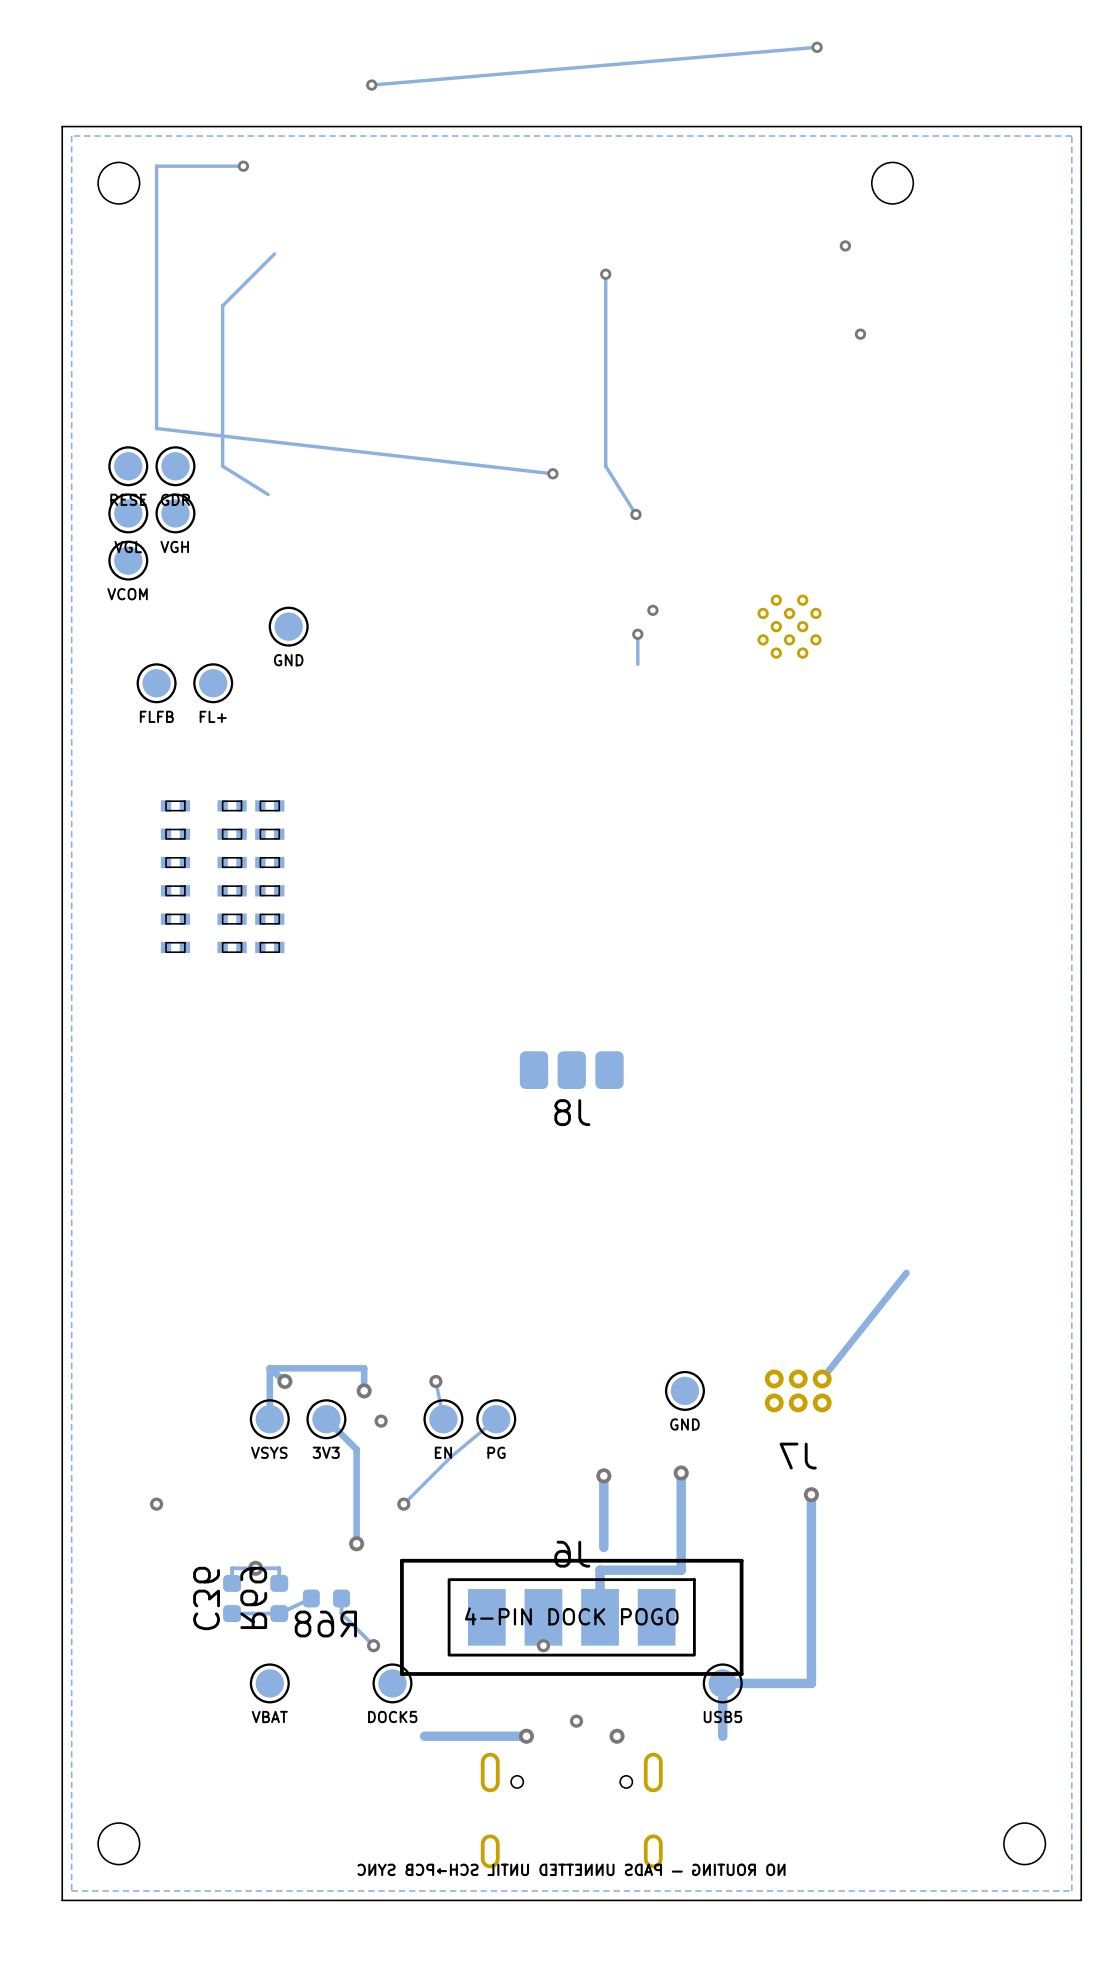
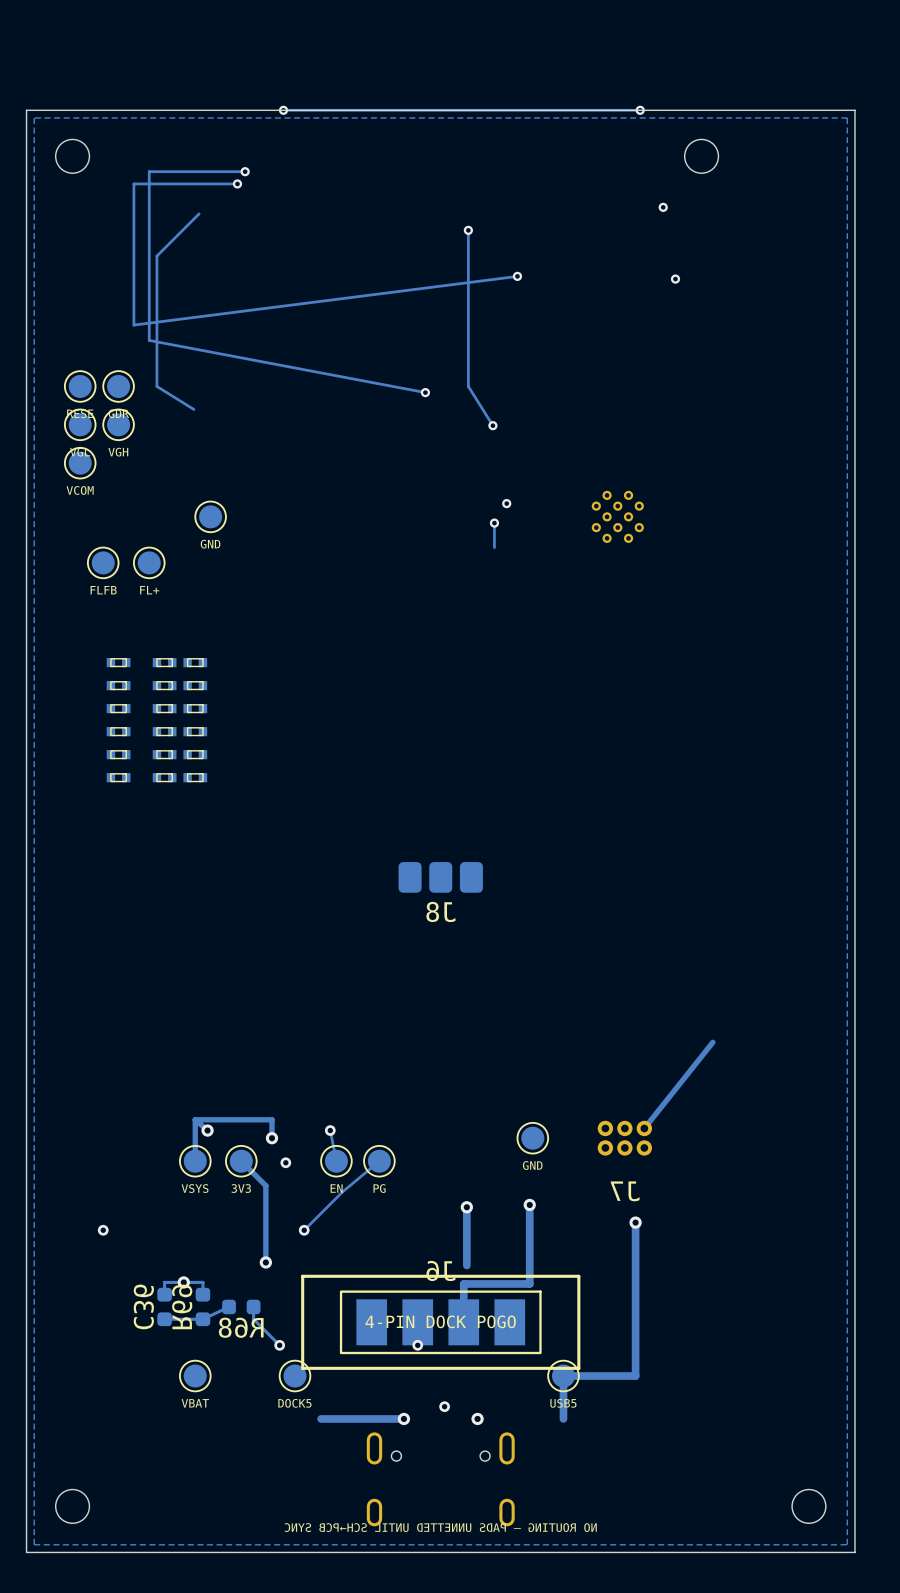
track: (817, 47) (371, 85) -> none
via position: (817, 47) -> (640, 110)
via position: (371, 85) -> (283, 110)
track: none -> (640, 110) (283, 110)
track: (243, 166) (156, 166) (156, 428) (552, 473) -> (245, 171) (149, 171) (149, 340) (425, 392)
via: (243, 166) -> none
via: none -> (245, 171)
track: none -> (237, 183) (133, 183) (133, 325) (517, 276)
via: none -> (237, 183)
via: none -> (517, 276)

